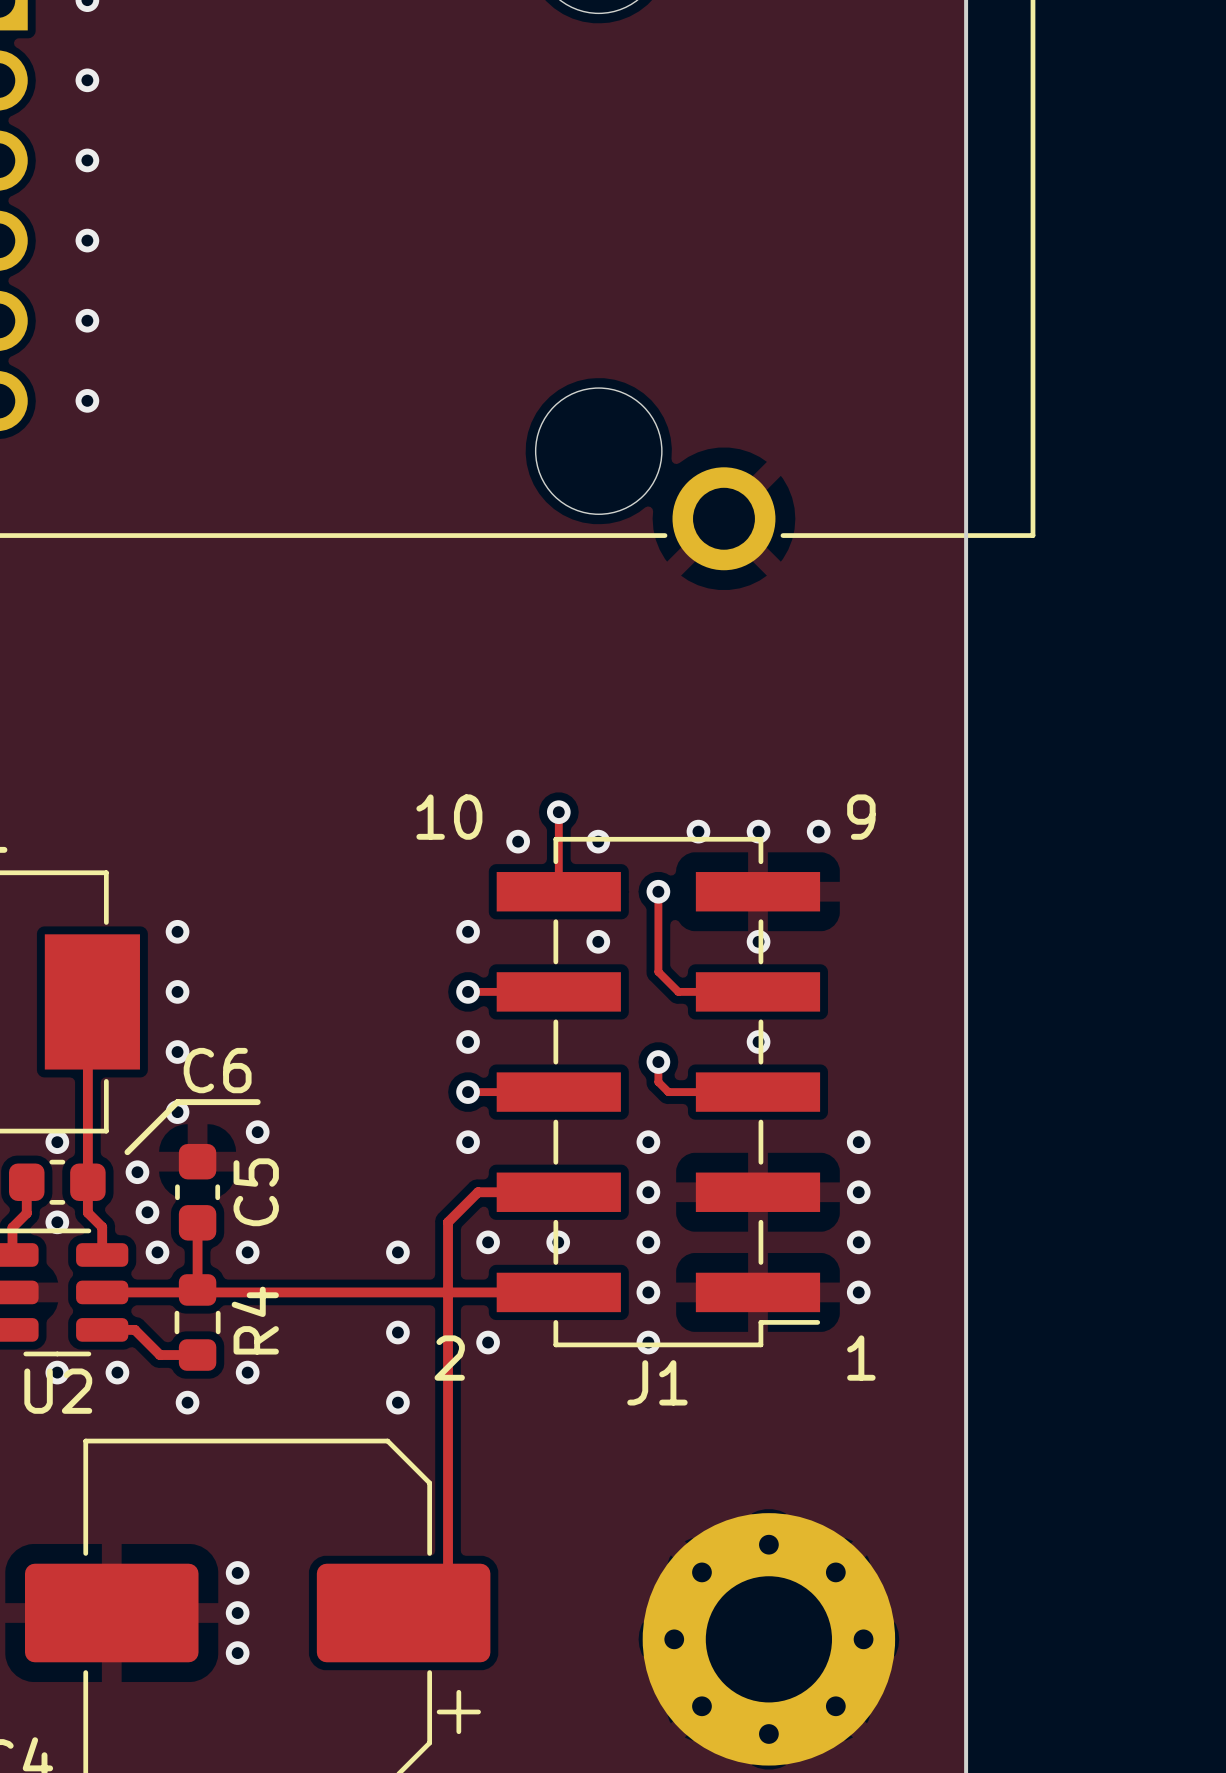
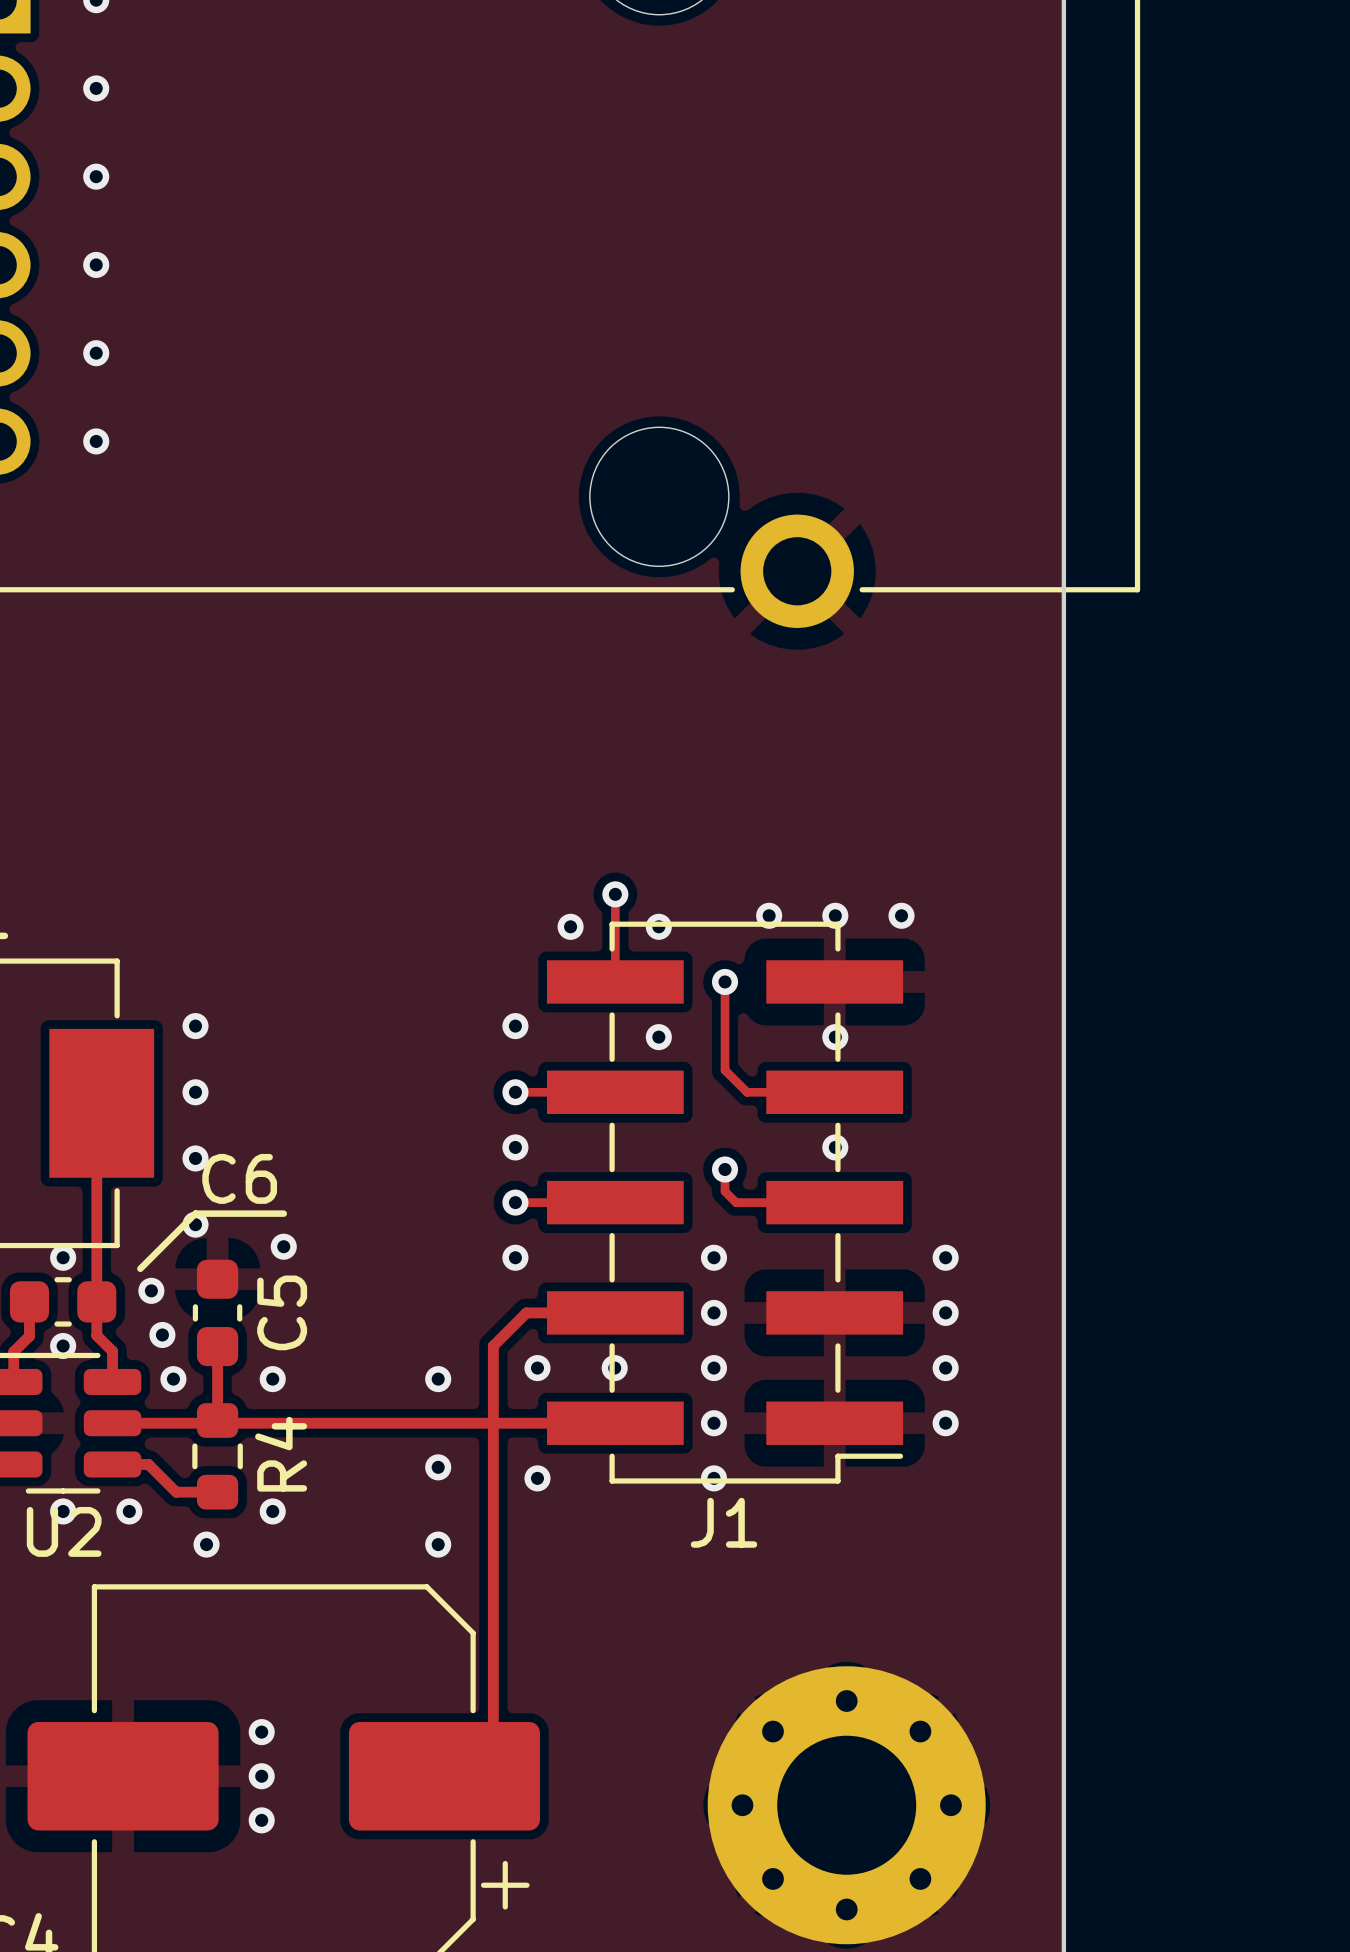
text: 10 (449, 817) -> none
text: 9 (861, 817) -> none
text: 2 (449, 1358) -> none
text: 1 (861, 1358) -> none

